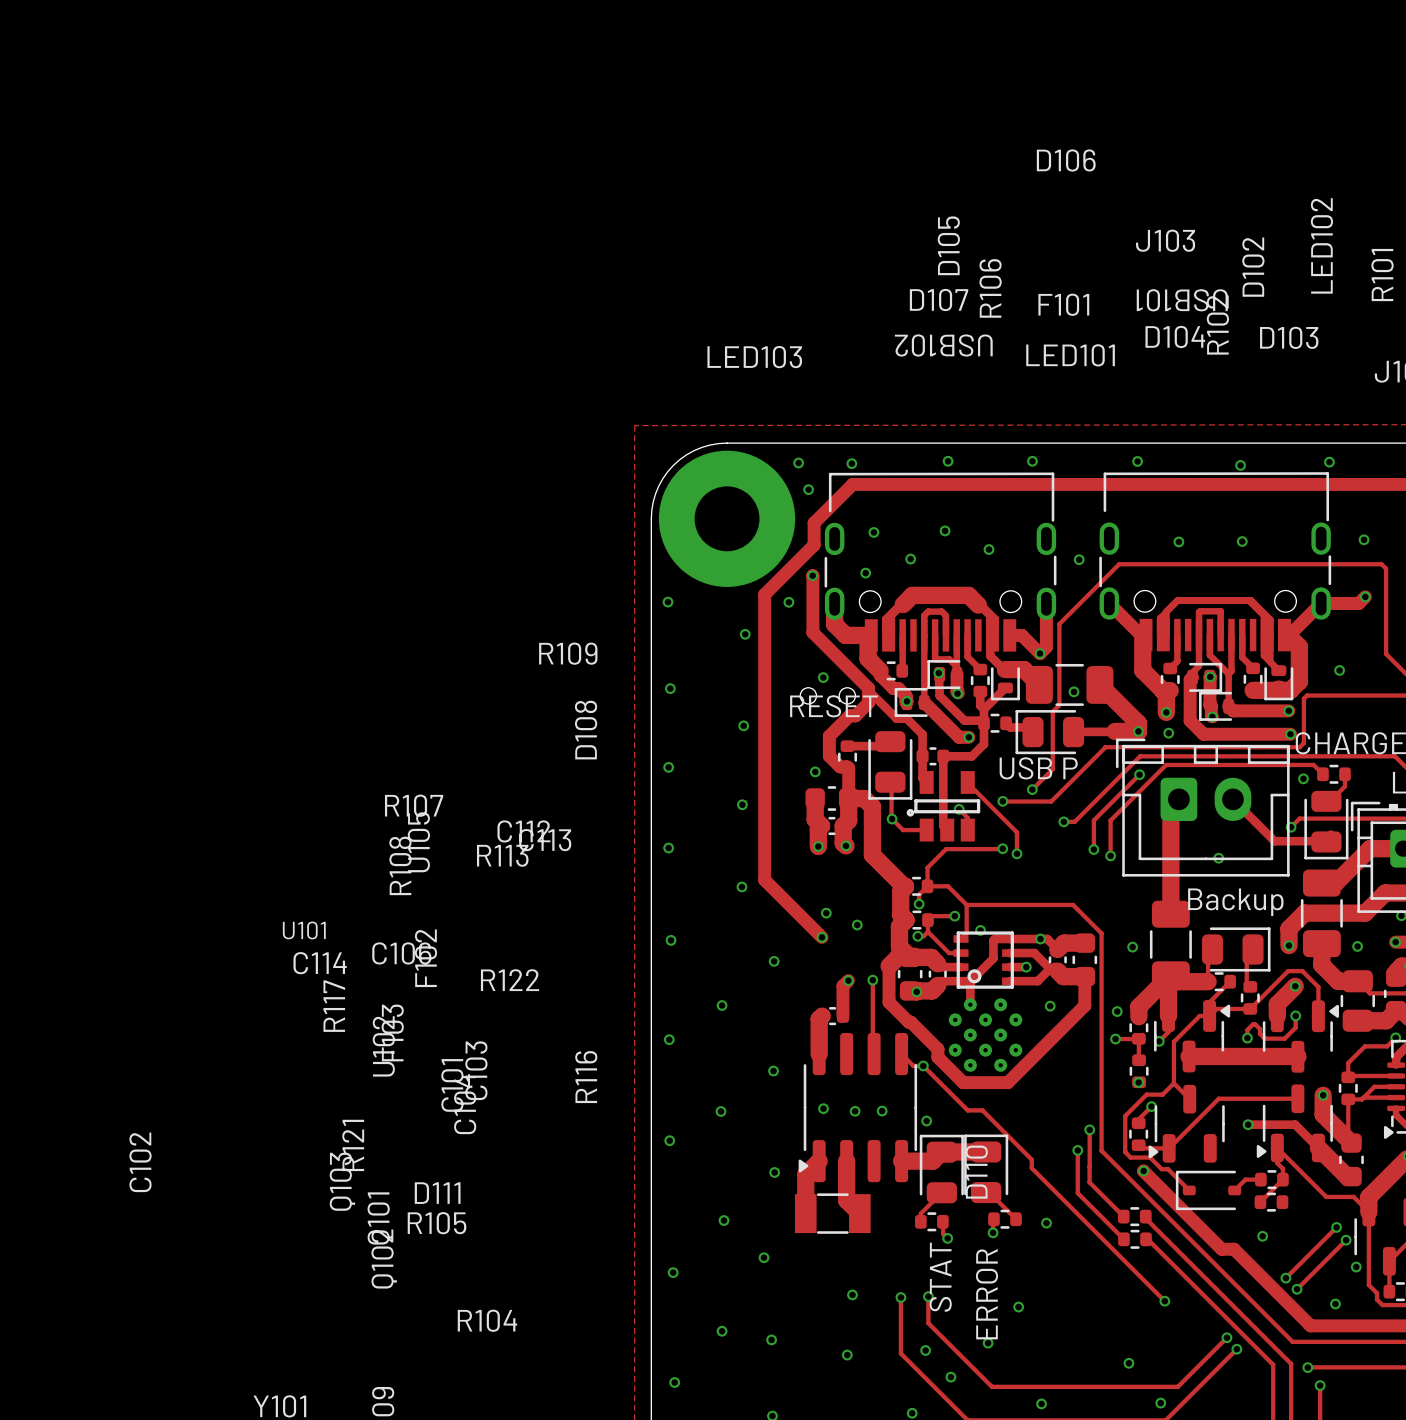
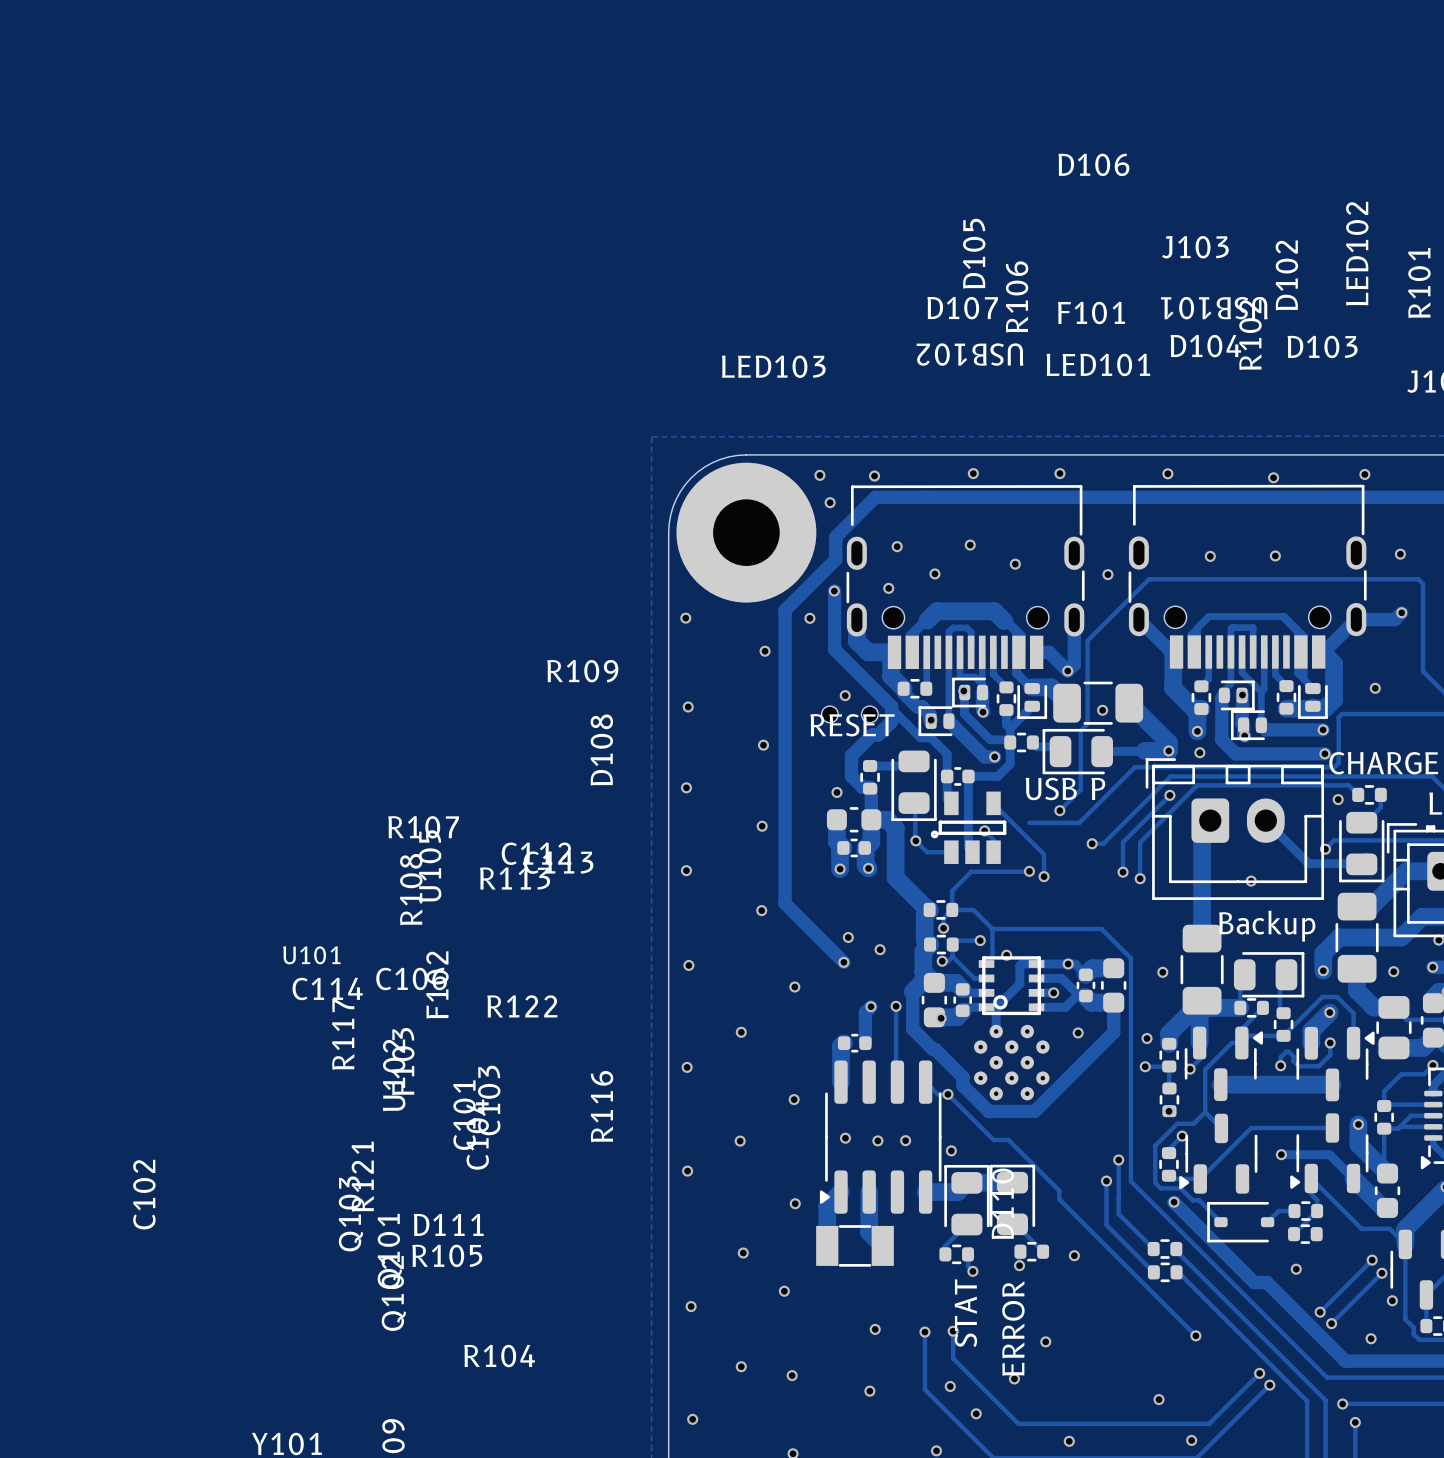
via: (1002, 801) -> none

